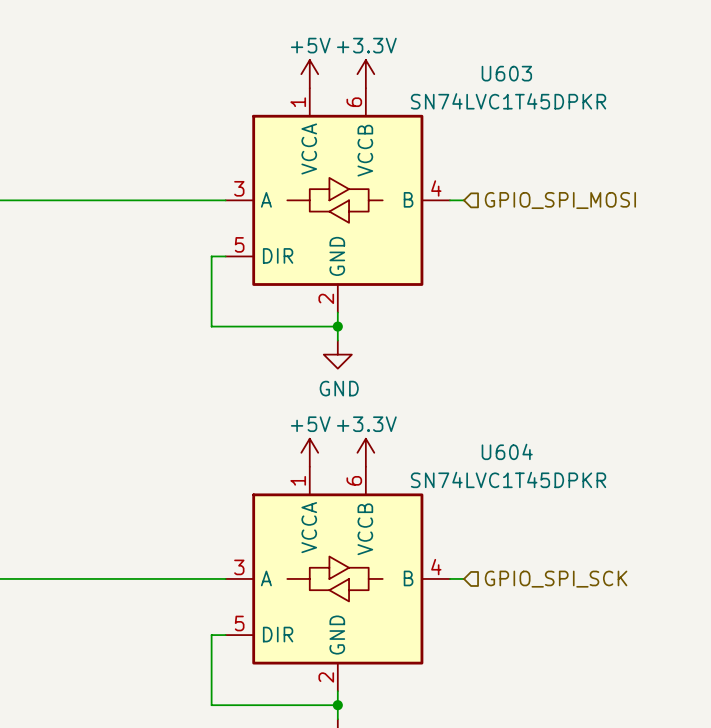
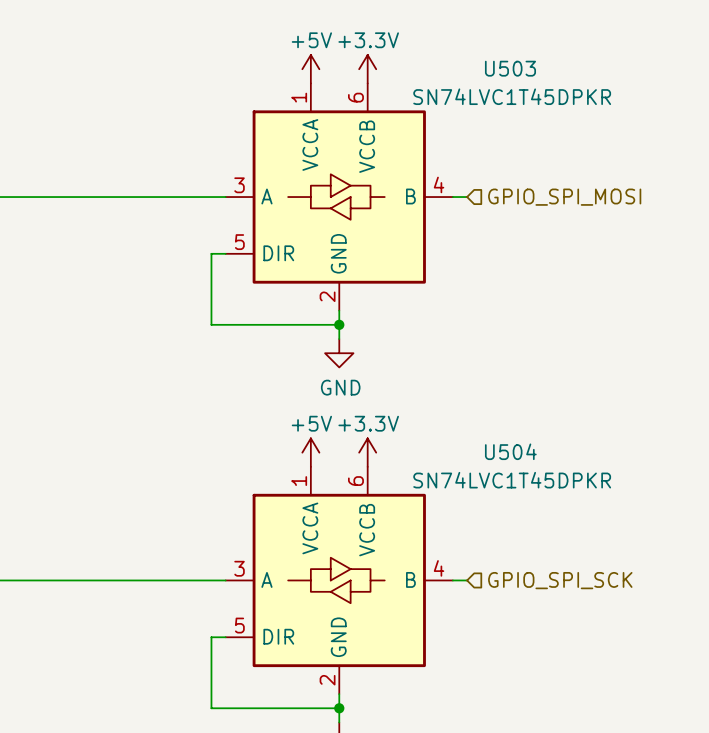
U603 name: U603 (506, 73) -> U503 (510, 68)
U604 name: U604 (507, 451) -> U504 (510, 451)

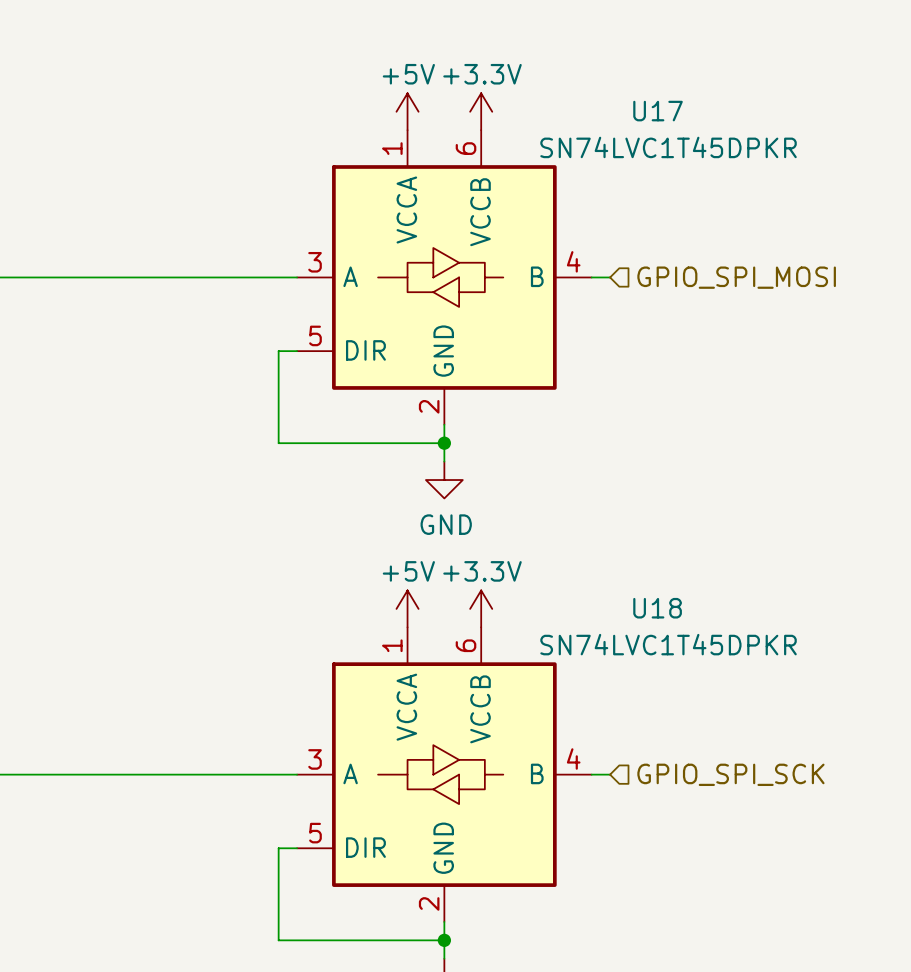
U503 name: U503 (510, 68) -> U17 (658, 111)
U504 name: U504 (510, 451) -> U18 (657, 608)

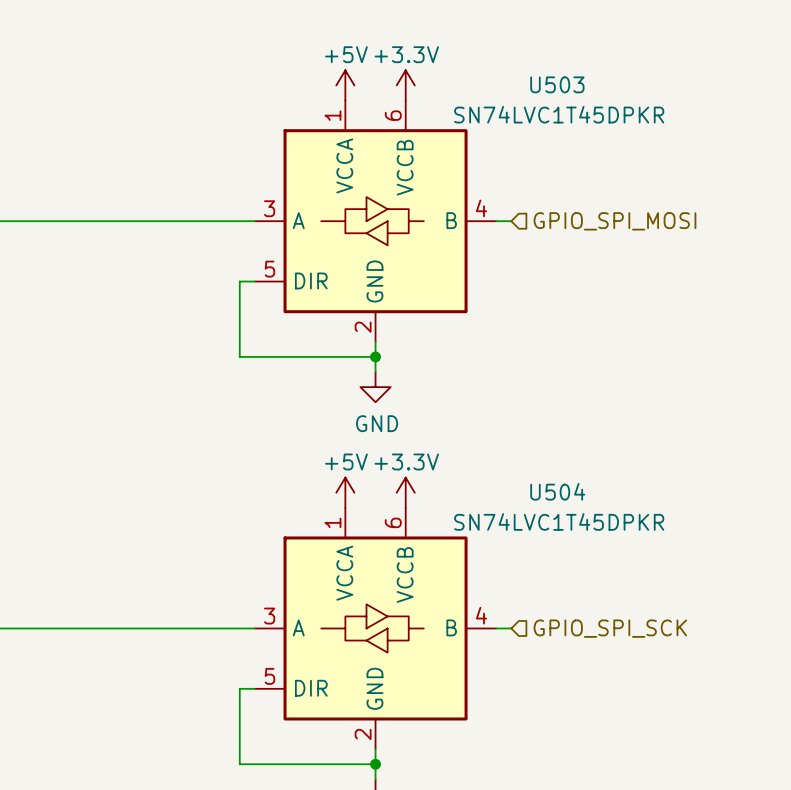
U17 name: U17 (658, 111) -> U503 (557, 84)
U18 name: U18 (657, 608) -> U504 (557, 491)

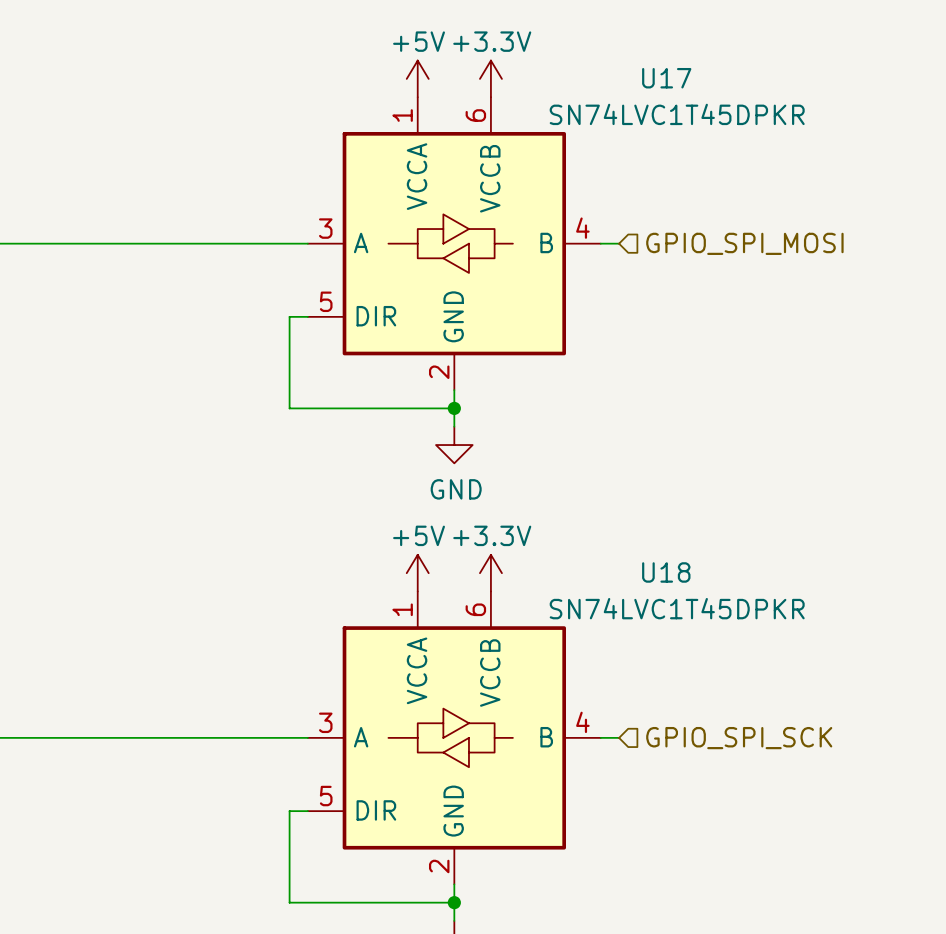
U503 name: U503 (557, 84) -> U17 (666, 78)
U504 name: U504 (557, 491) -> U18 (666, 572)

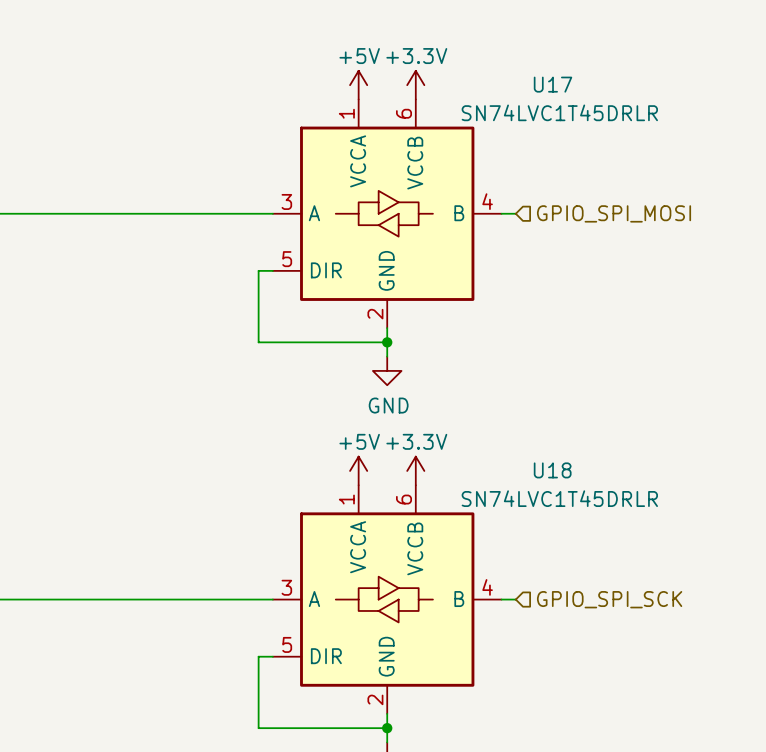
U17 value: SN74LVC1T45DPKR (677, 114) -> SN74LVC1T45DRLR (559, 112)
U18 value: SN74LVC1T45DPKR (677, 608) -> SN74LVC1T45DRLR (559, 498)

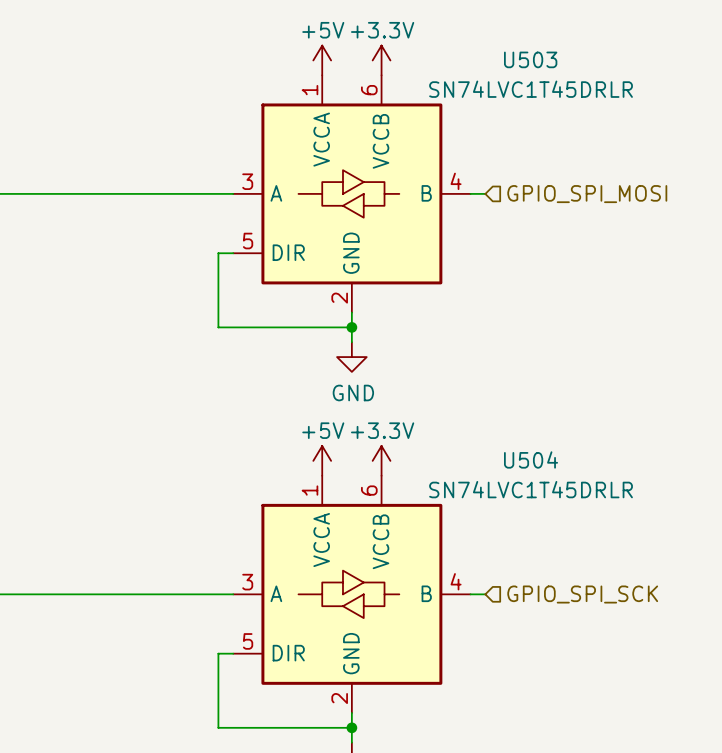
U17 name: U17 (553, 84) -> U503 (530, 59)
U18 name: U18 (552, 470) -> U504 (531, 459)

